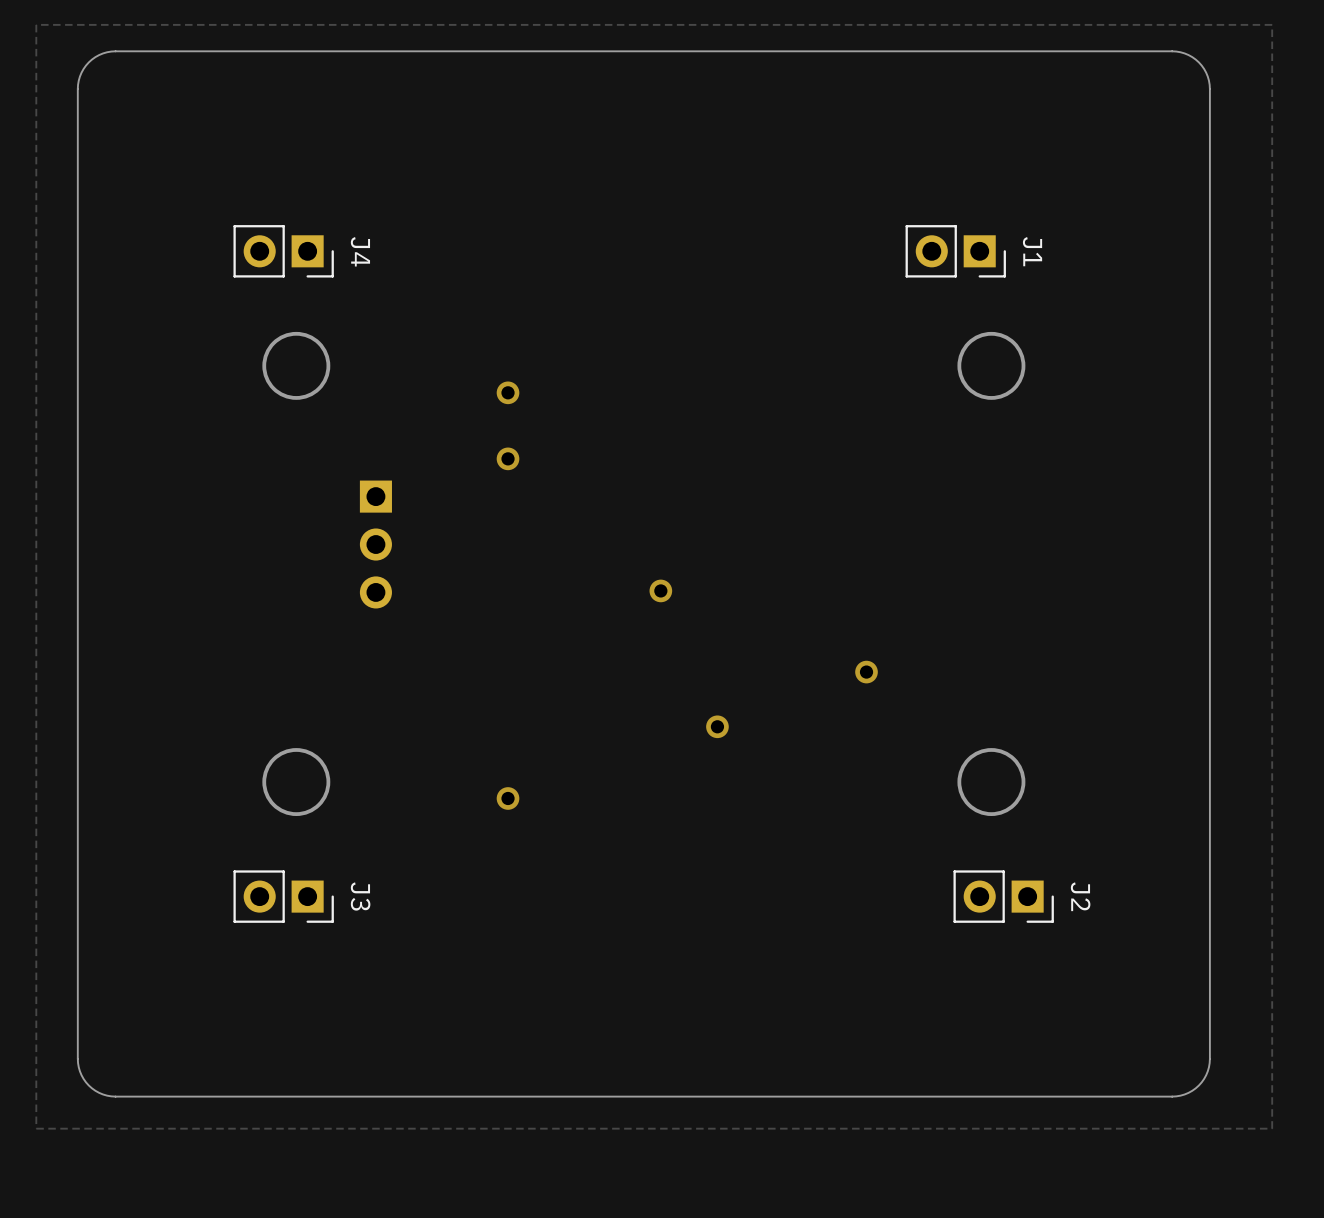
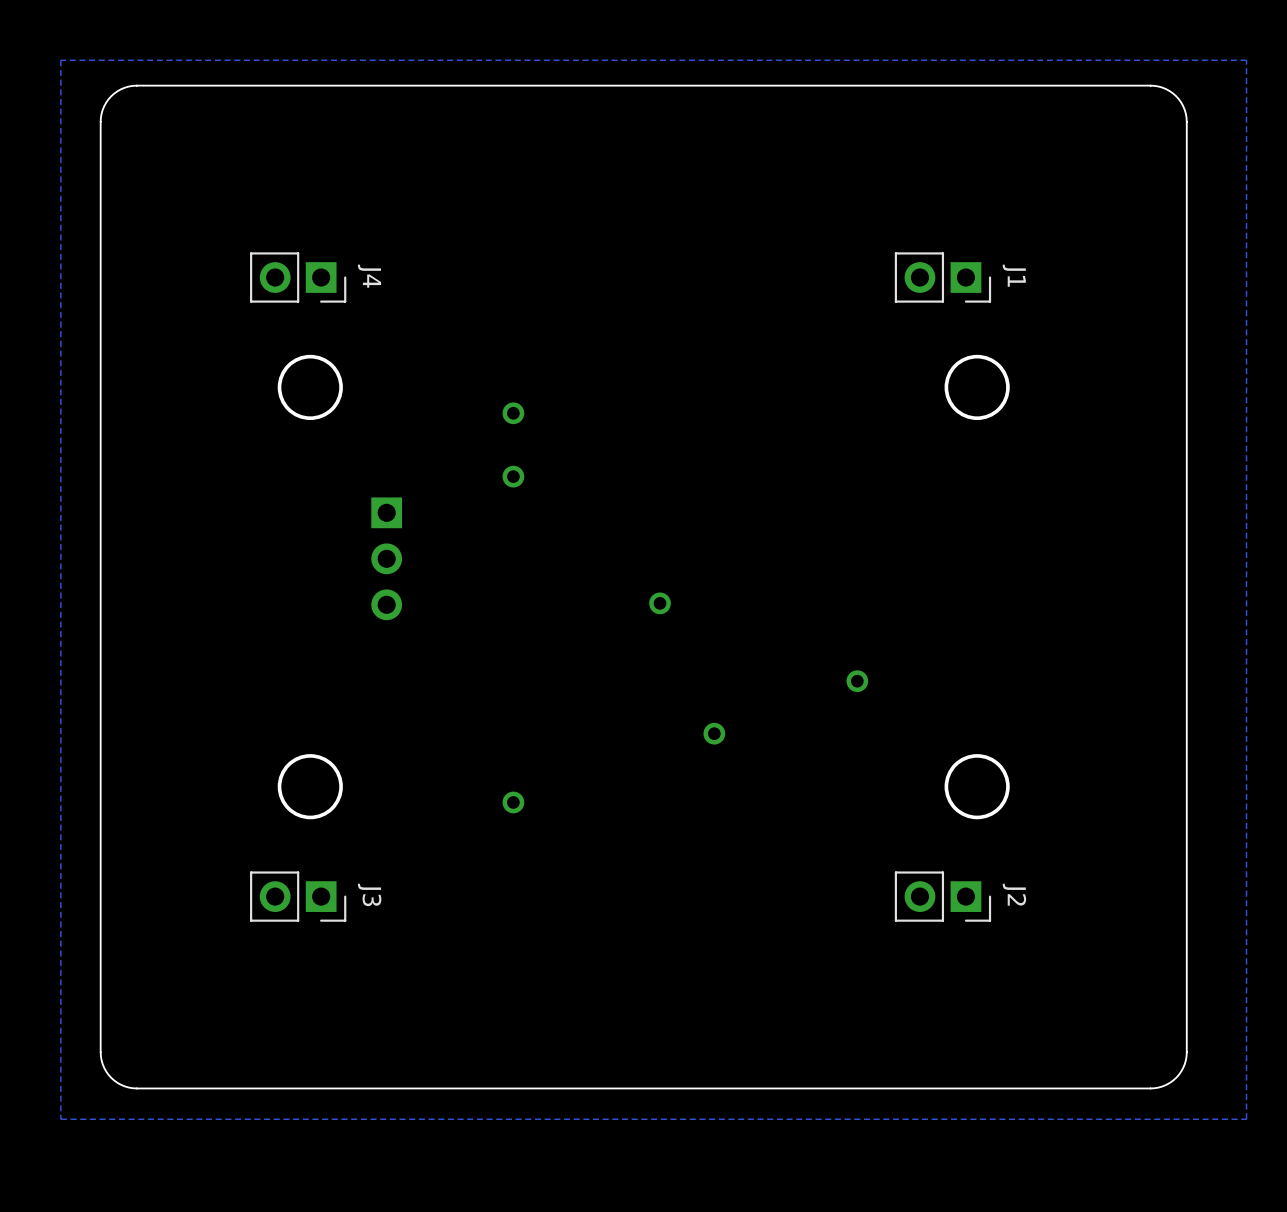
J2 position: (1003, 896) -> (942, 896)

